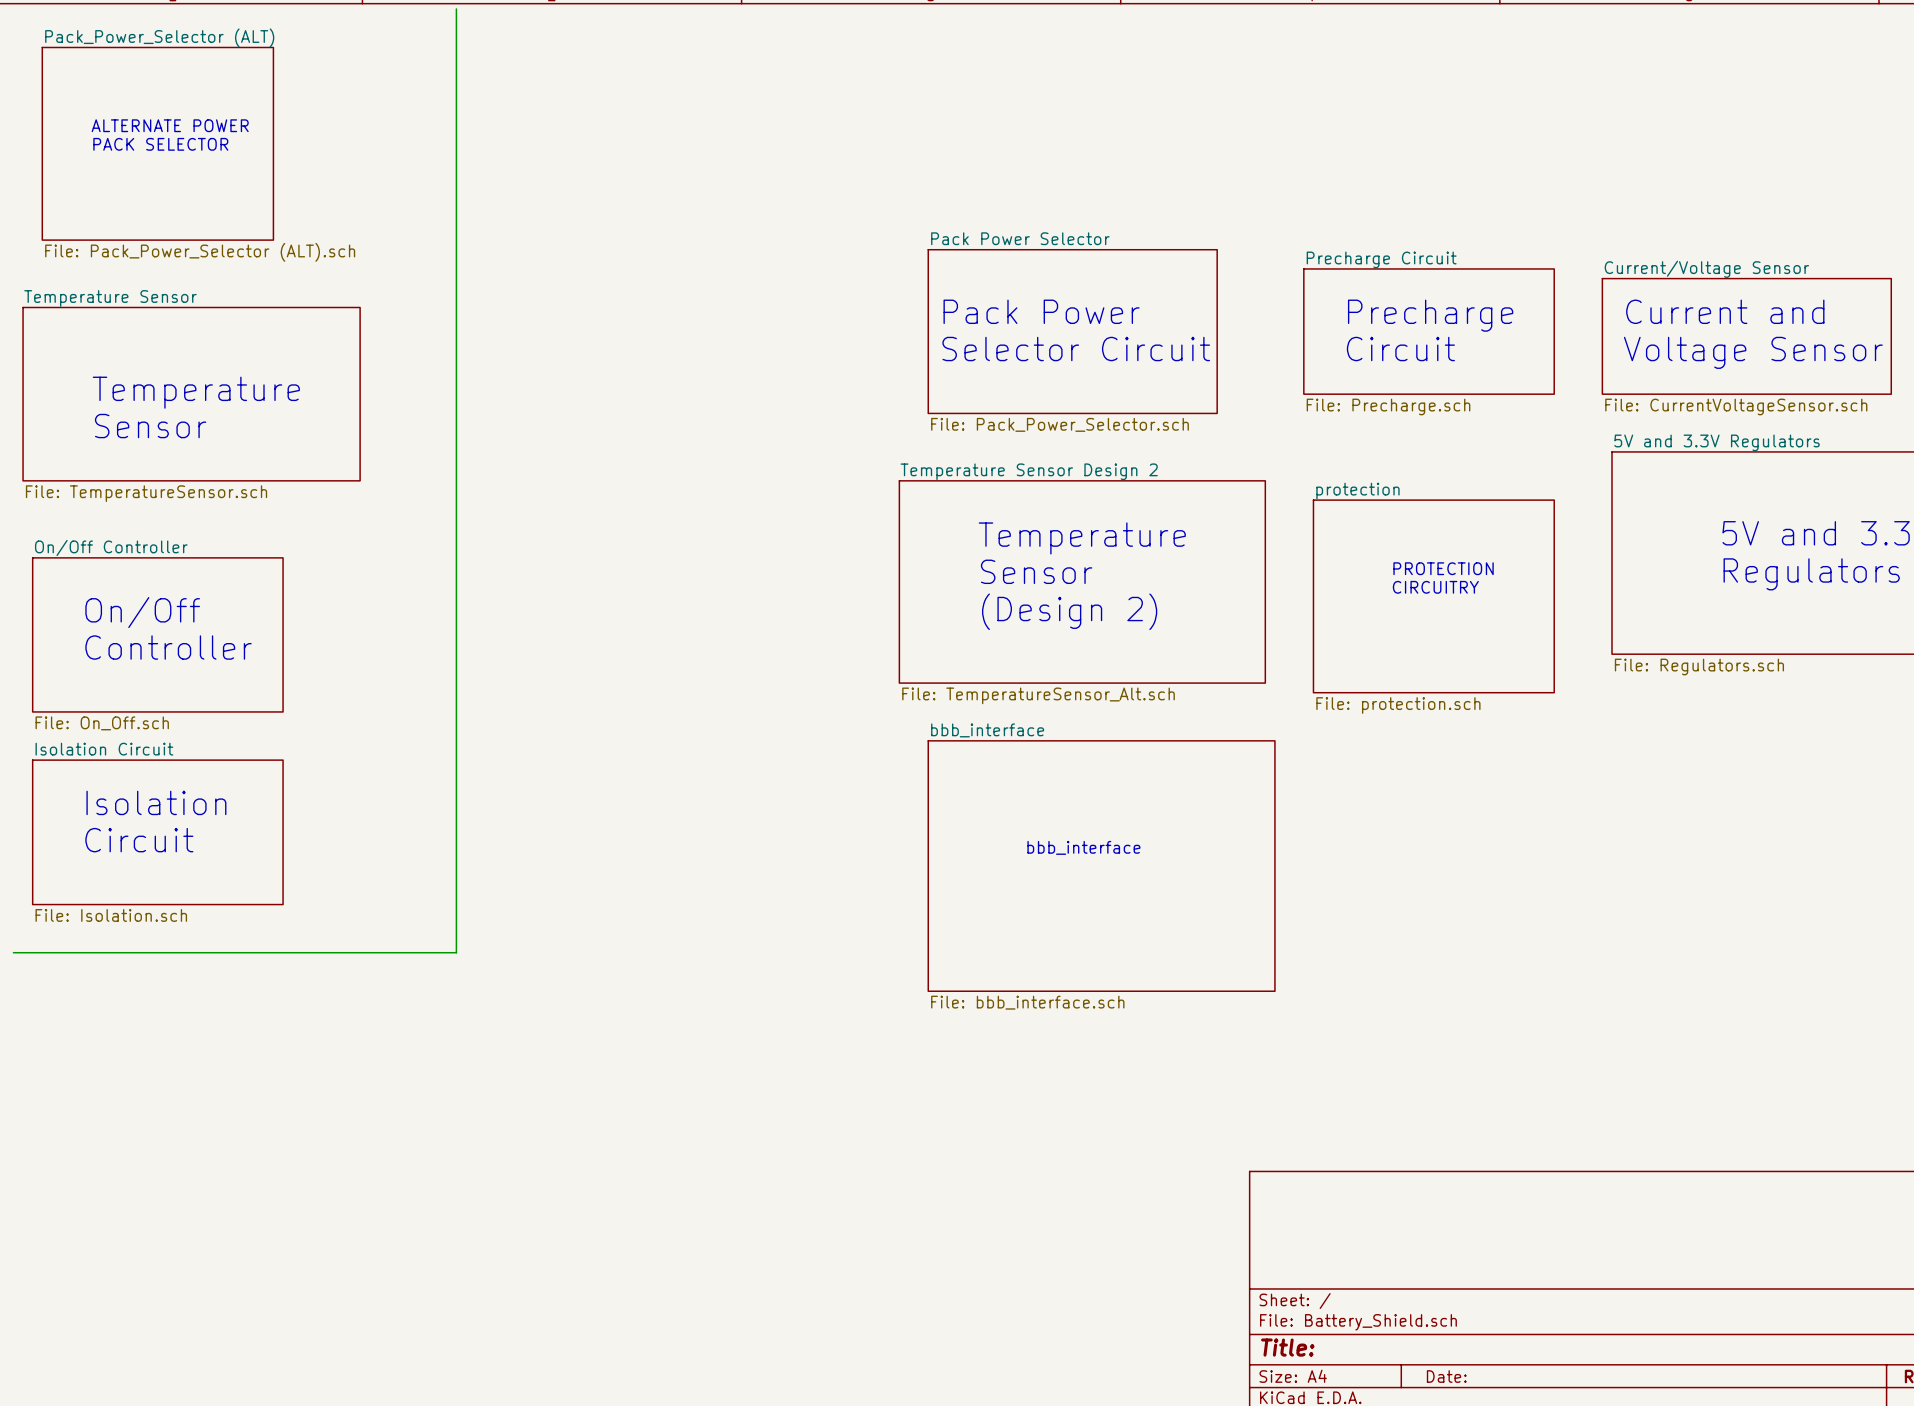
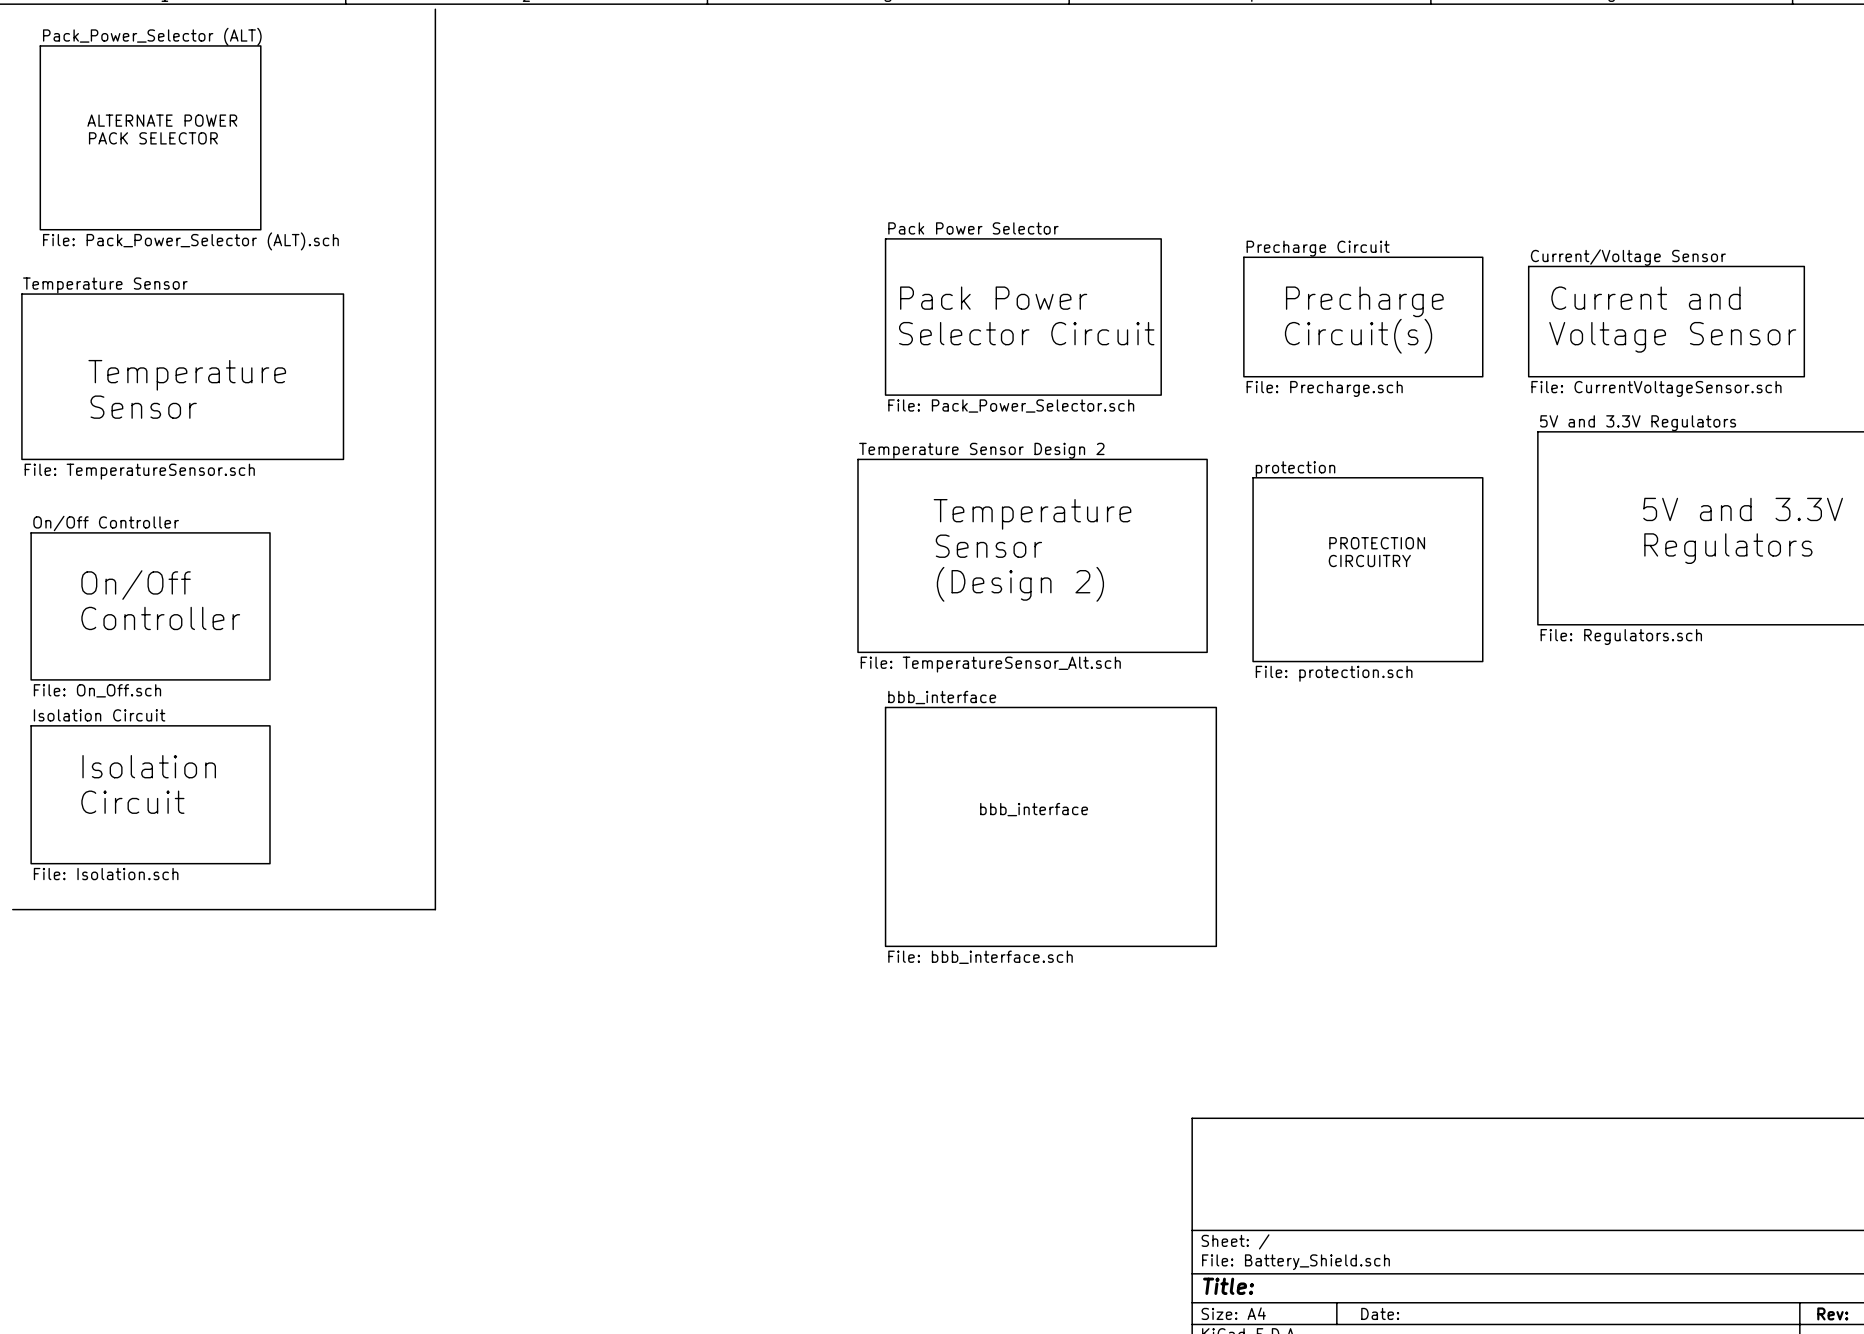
text: Circuit (1400, 349) -> Circuit(s) (1358, 336)

